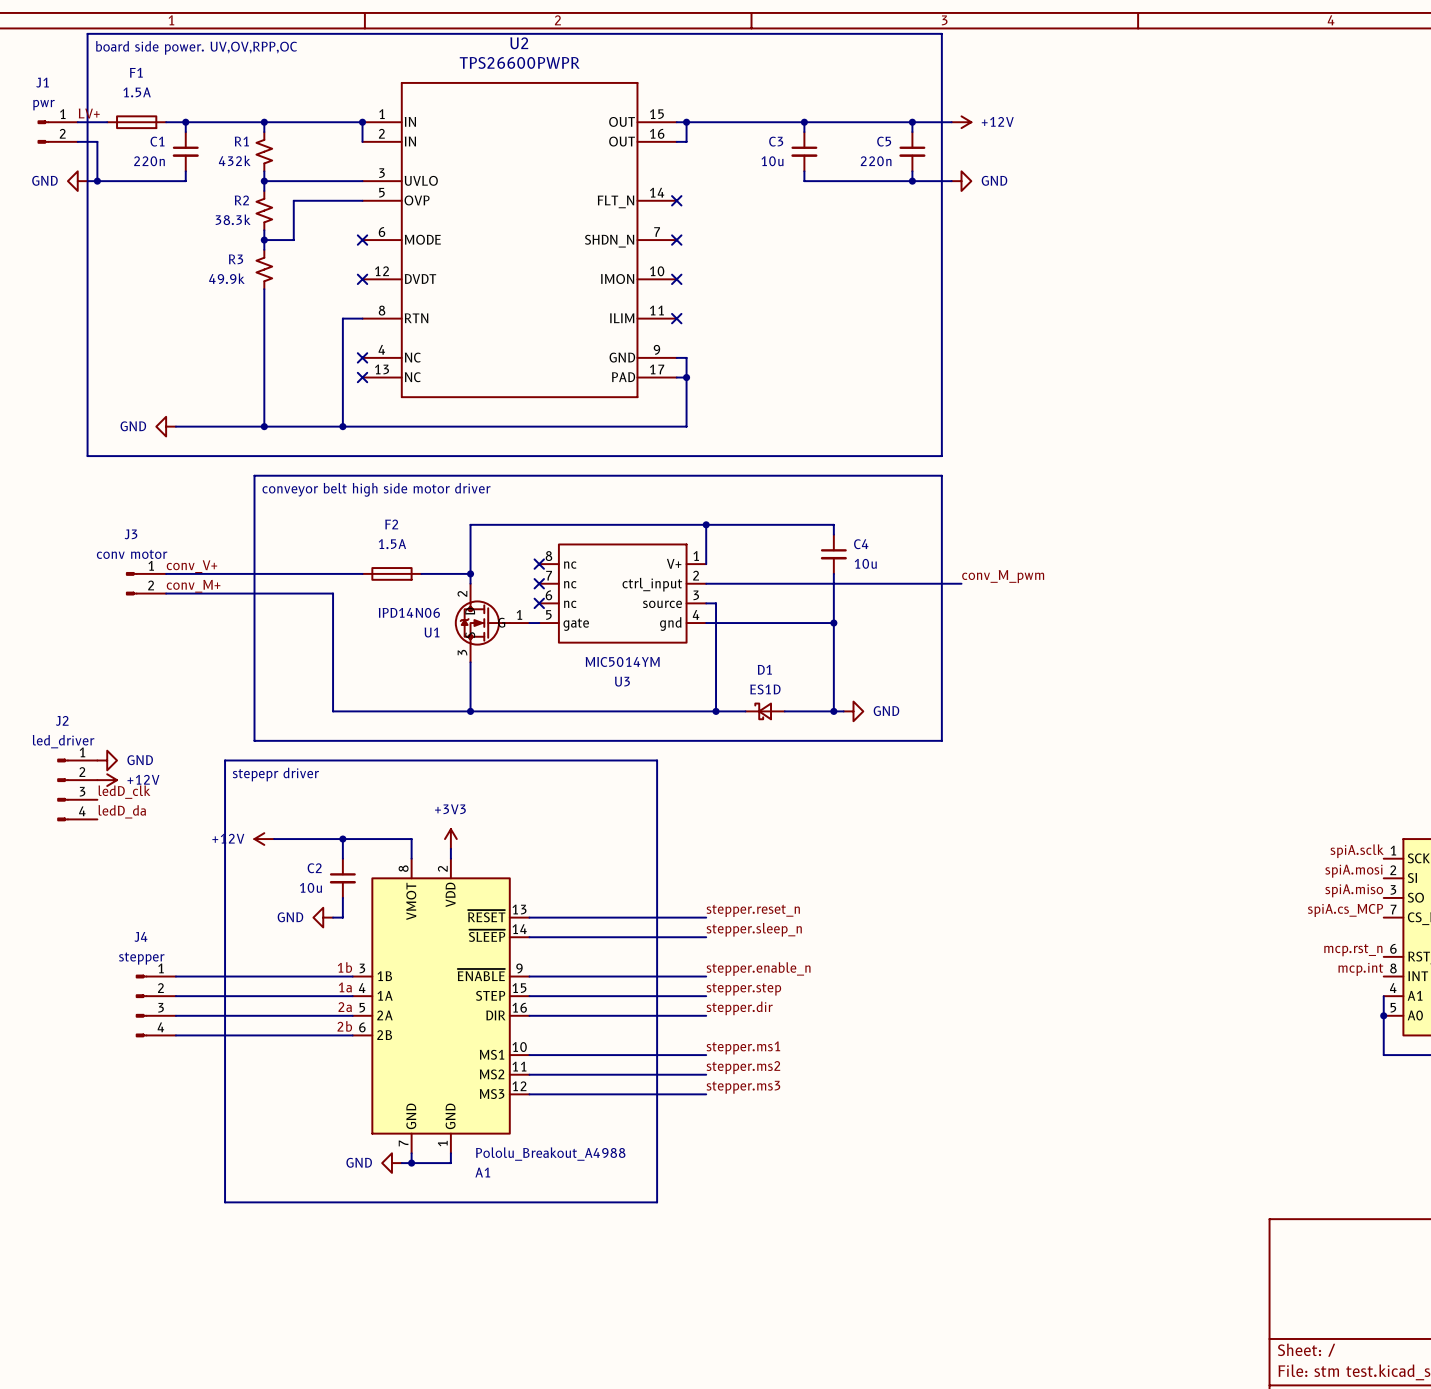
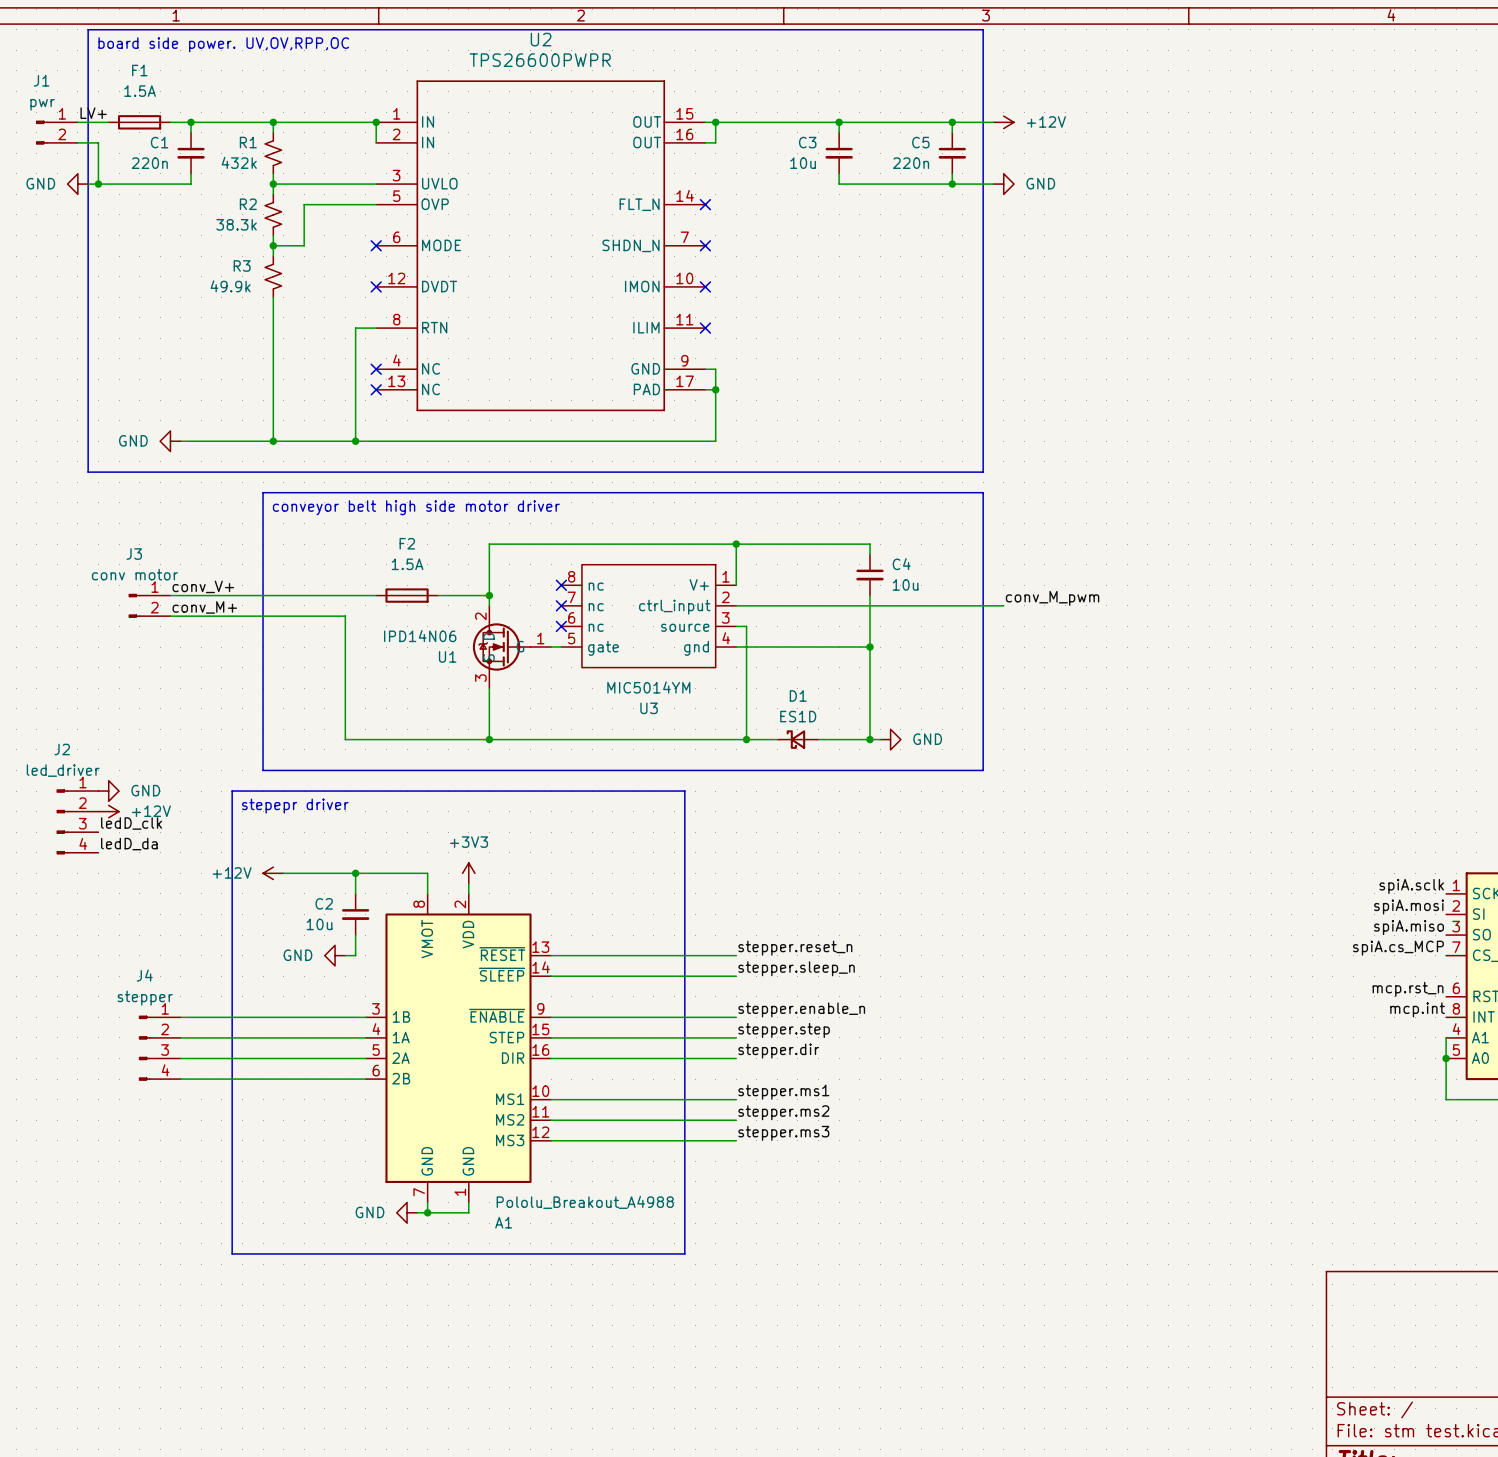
label: 1b (344, 967) -> none
label: 1a (345, 987) -> none
label: 2a (345, 1007) -> none
label: 2b (344, 1026) -> none

